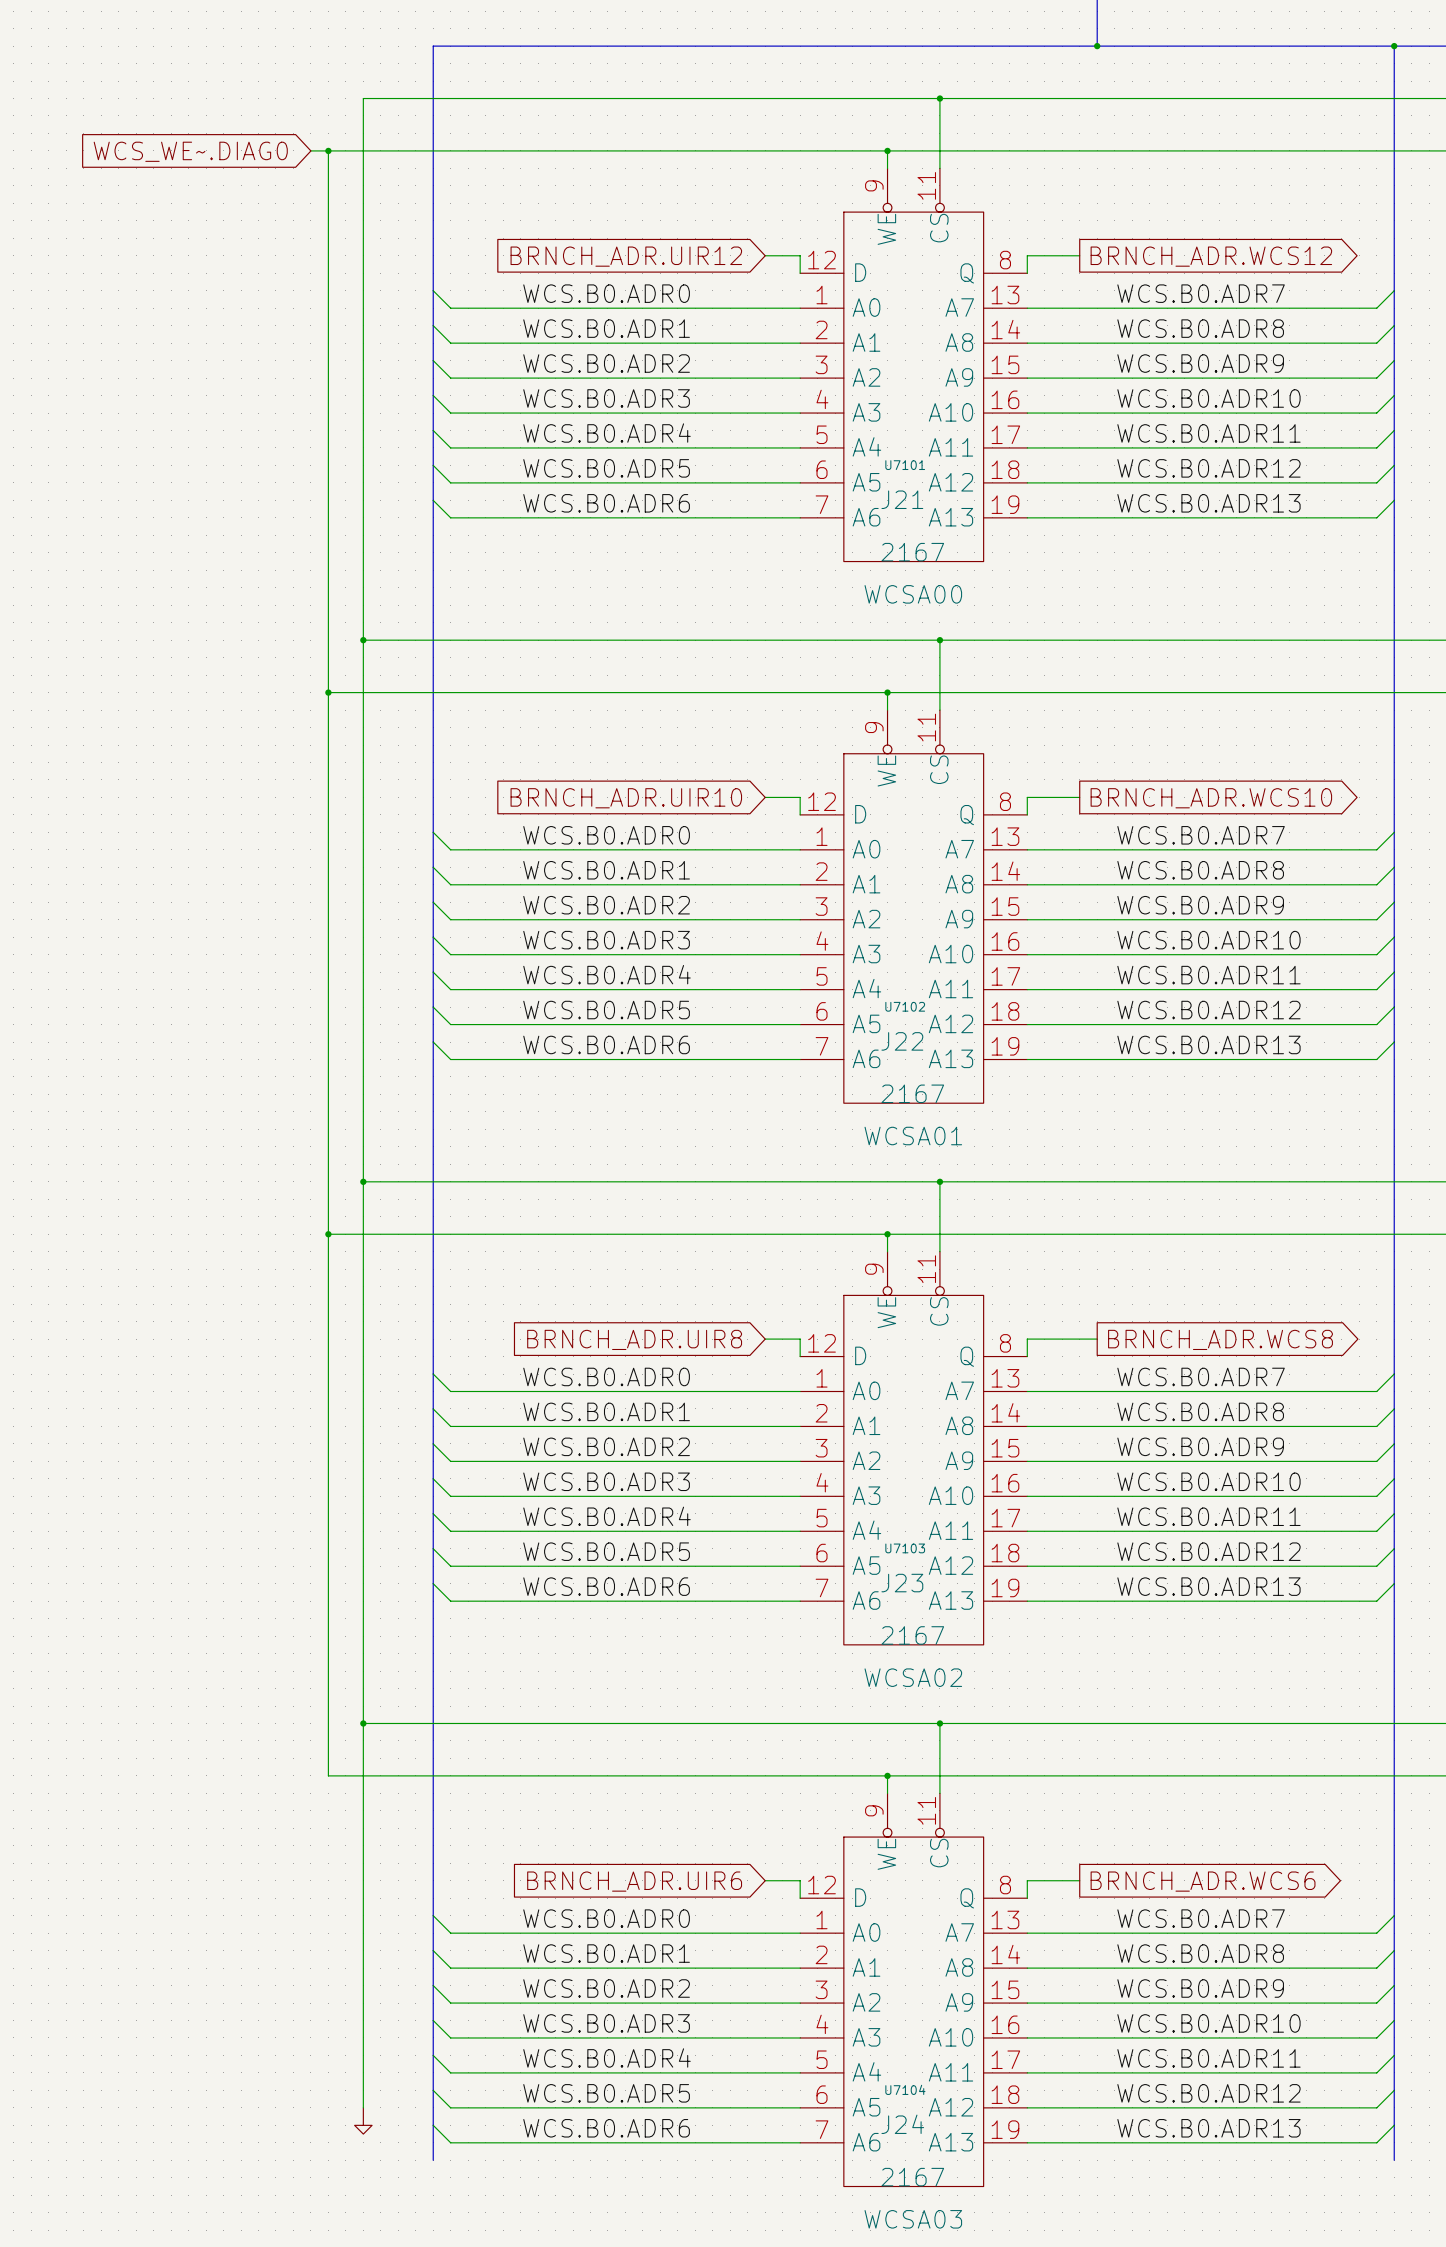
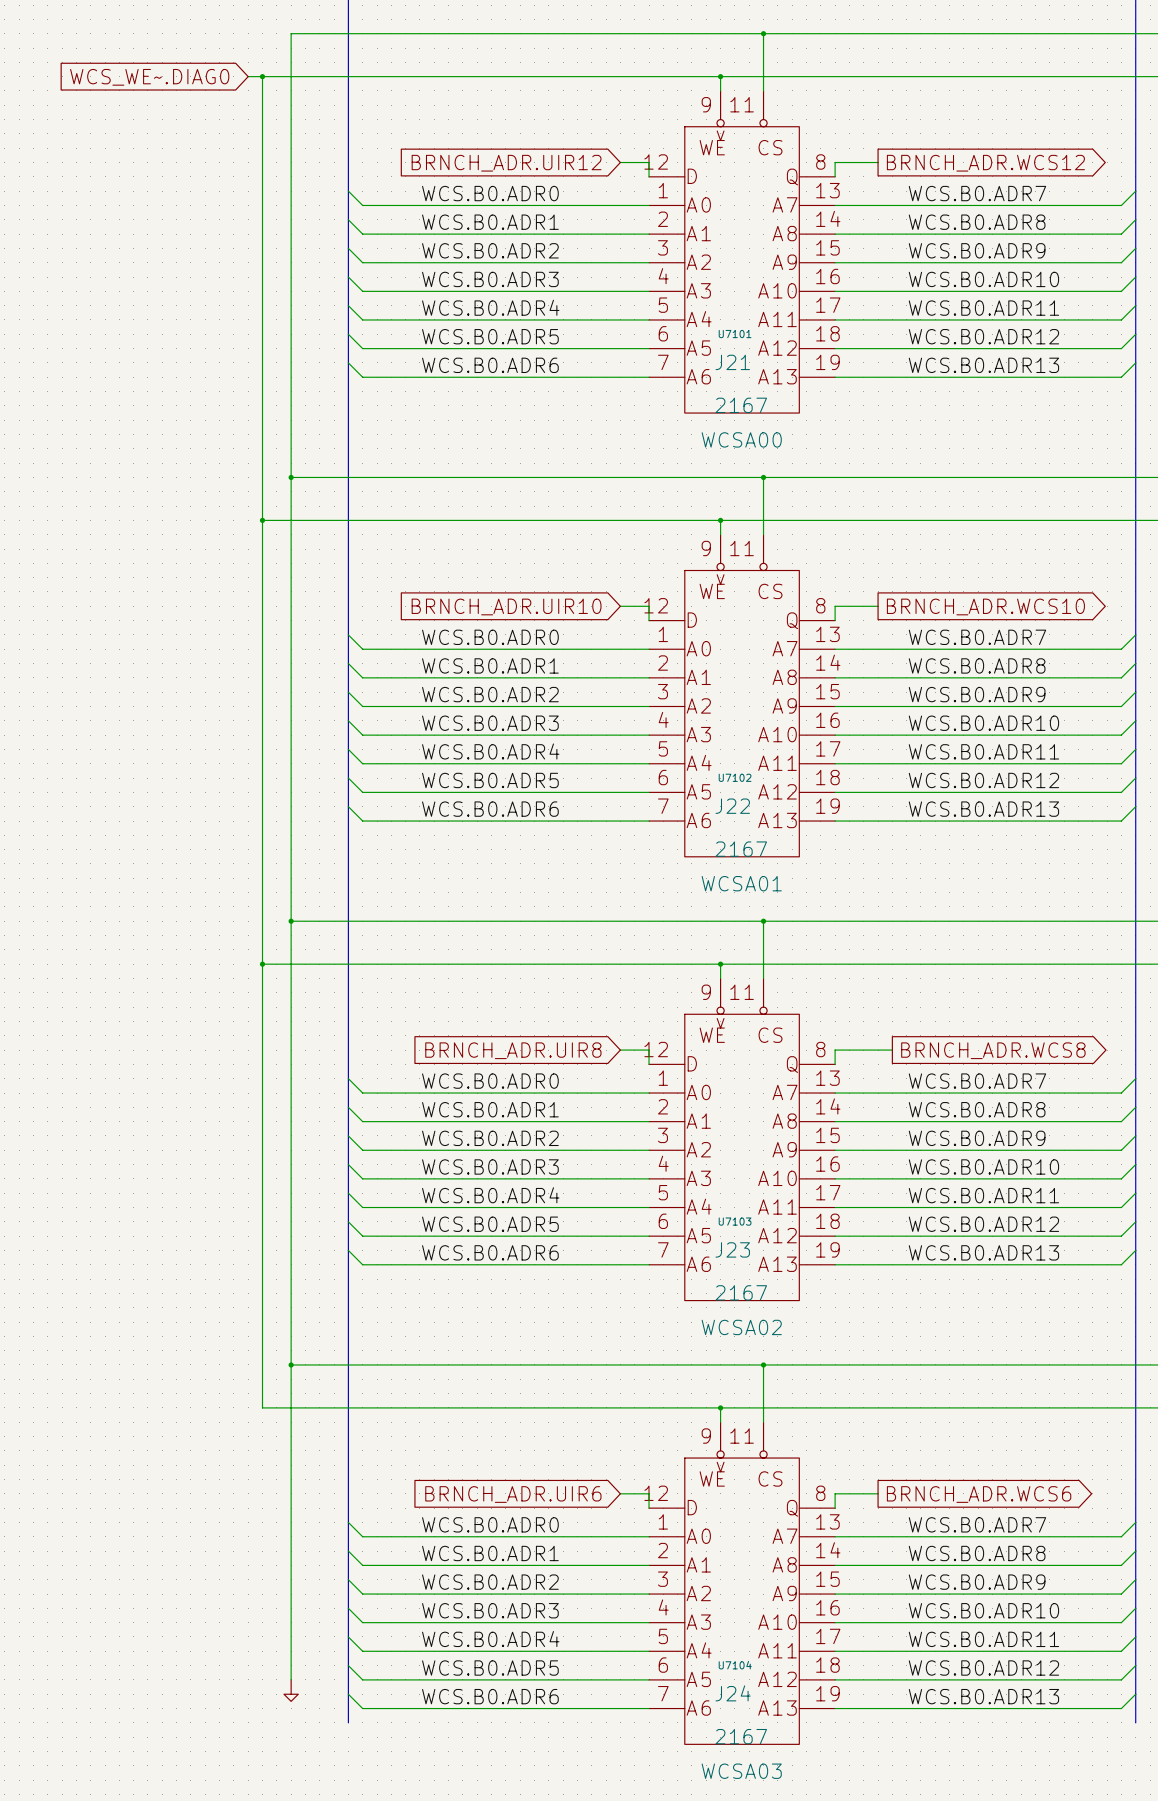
U7101 symbol: [800, 168, 1028, 562] -> [649, 90, 836, 414]
U7102 symbol: [800, 710, 1028, 1104] -> [649, 534, 836, 857]
U7103 symbol: [800, 1251, 1028, 1645] -> [649, 978, 836, 1301]
U7104 symbol: [800, 1793, 1028, 2187] -> [649, 1422, 836, 1745]

